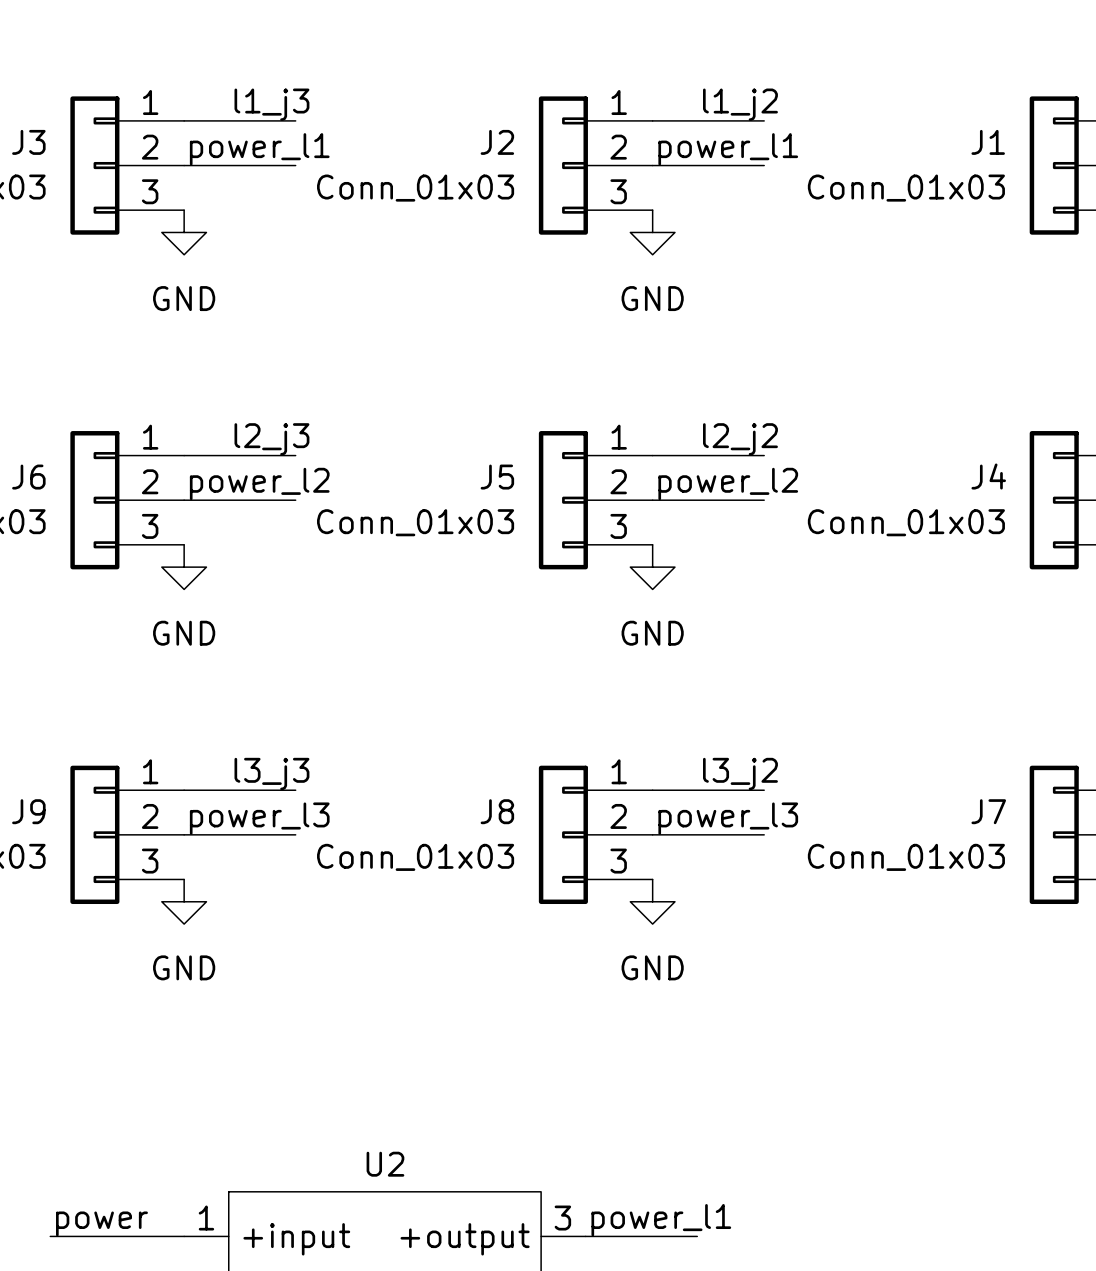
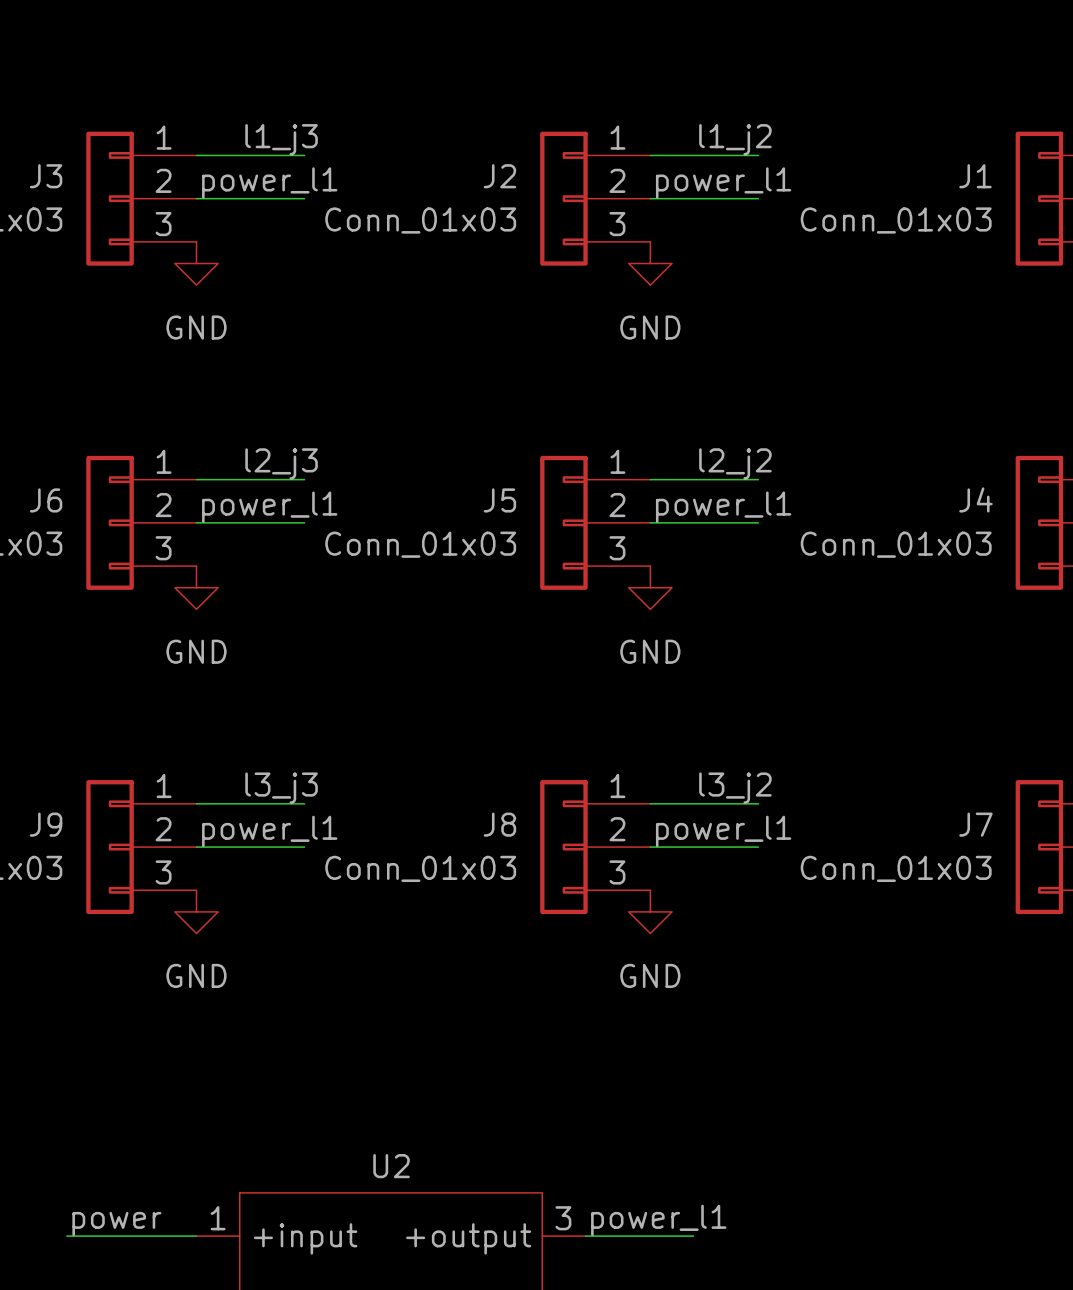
label: power_l2 (259, 484) -> power_l1 (269, 507)
label: power_l2 (728, 484) -> power_l1 (723, 507)
label: power_l3 (259, 818) -> power_l1 (269, 831)
label: power_l3 (728, 818) -> power_l1 (723, 831)

